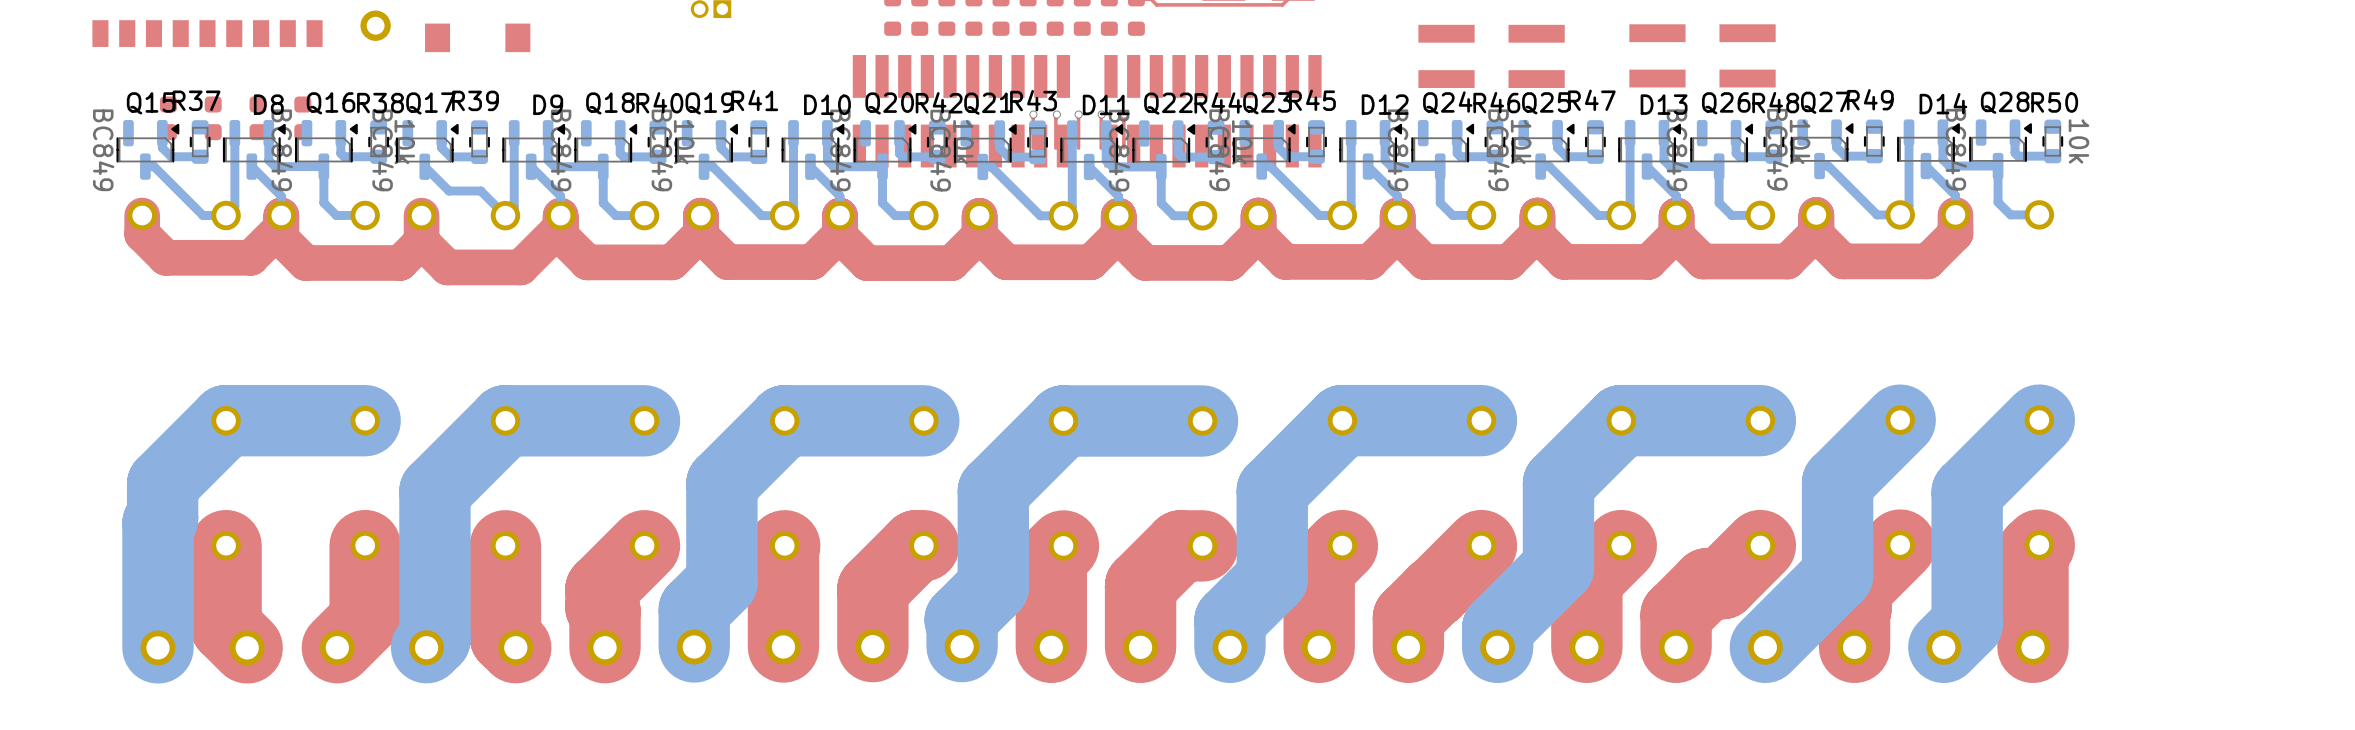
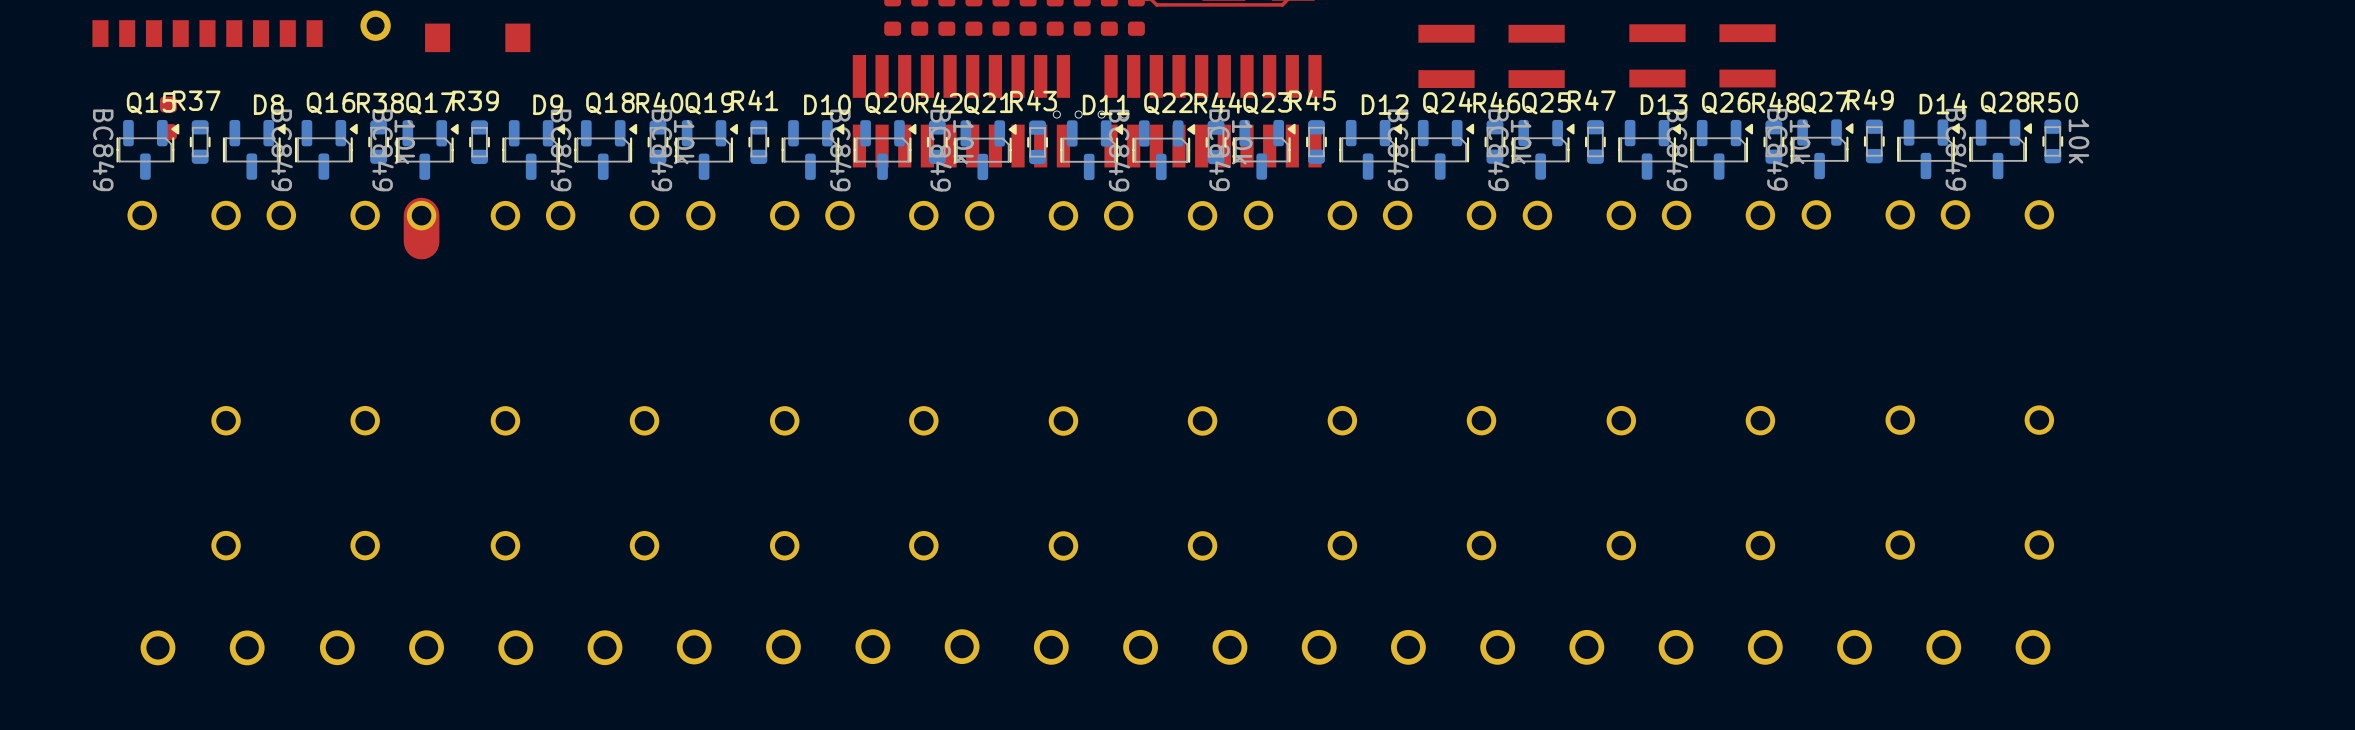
part: (711, 9) -> none
via: (1033, 114) -> none
top track: (1033, 116) (1033, 148) -> none
top track: (1101, 116) (1101, 148) -> none
top track: (1124, 116) (1123, 148) -> none
top track: (1056, 117) (1055, 148) -> none
top track: (1078, 117) (1078, 148) -> none
part: (213, 118) -> none
part: (258, 118) -> none
part: (302, 118) -> none
bottom track: (1836, 132) (1836, 147) (1845, 156) (1874, 156) -> none
bottom track: (1909, 132) (1909, 206) (1900, 214) (1877, 214) (1828, 166) (1819, 166) -> none
bottom track: (1942, 132) (1942, 159) (1949, 166) (1998, 166) (1998, 202) (2010, 214) (2039, 214) -> none
bottom track: (2015, 132) (2015, 152) (2018, 156) (2052, 156) -> none
bottom track: (162, 133) (162, 147) (171, 156) (200, 156) -> none
bottom track: (234, 133) (234, 206) (226, 215) (203, 215) (154, 166) (145, 166) -> none
bottom track: (268, 133) (268, 160) (275, 166) (323, 166) (323, 202) (336, 215) (365, 215) -> none
bottom track: (340, 133) (340, 153) (344, 156) (378, 156) -> none
bottom track: (441, 133) (441, 148) (450, 156) (479, 156) -> none
bottom track: (514, 133) (514, 206) (505, 215) (480, 191) (449, 191) (424, 166) -> none
bottom track: (548, 133) (548, 160) (554, 166) (603, 166) (603, 203) (615, 215) (644, 215) -> none
bottom track: (620, 133) (620, 153) (623, 156) (658, 156) -> none
bottom track: (721, 133) (721, 148) (729, 156) (758, 156) -> none
bottom track: (793, 133) (793, 206) (784, 215) (761, 215) (712, 166) (704, 166) -> none
bottom track: (827, 133) (827, 160) (833, 166) (882, 166) (882, 203) (895, 215) (923, 215) -> none
bottom track: (899, 133) (899, 153) (902, 156) (937, 156) -> none
bottom track: (999, 133) (999, 148) (1008, 157) (1037, 157) -> none
bottom track: (1072, 133) (1072, 207) (1063, 215) (1040, 215) (991, 166) (982, 166) -> none
bottom track: (1106, 133) (1106, 160) (1112, 166) (1161, 166) (1161, 203) (1173, 215) (1202, 215) -> none
bottom track: (1178, 133) (1178, 153) (1181, 157) (1216, 157) -> none
bottom track: (1278, 133) (1278, 147) (1287, 156) (1316, 156) -> none
bottom track: (1351, 133) (1351, 206) (1342, 215) (1319, 215) (1270, 166) (1261, 166) -> none
bottom track: (1385, 133) (1385, 160) (1391, 166) (1440, 166) (1440, 202) (1452, 215) (1481, 215) -> none
bottom track: (1457, 133) (1457, 153) (1460, 156) (1494, 156) -> none
bottom track: (1557, 133) (1557, 147) (1566, 156) (1595, 156) -> none
bottom track: (1630, 133) (1630, 206) (1621, 215) (1598, 215) (1549, 166) (1540, 166) -> none
bottom track: (1664, 133) (1664, 160) (1670, 166) (1719, 166) (1719, 202) (1731, 215) (1760, 215) -> none
bottom track: (1736, 133) (1736, 153) (1739, 156) (1773, 156) -> none
bottom track: (251, 166) (281, 196) (281, 215) -> none
bottom track: (531, 166) (560, 196) (560, 215) -> none
bottom track: (810, 166) (839, 196) (839, 215) -> none
bottom track: (1089, 166) (1118, 196) (1118, 215) -> none
bottom track: (1368, 166) (1397, 196) (1397, 215) -> none
bottom track: (1647, 166) (1676, 196) (1676, 215) -> none
bottom track: (1925, 166) (1955, 195) (1955, 214) -> none
top track: (1955, 214) (1955, 233) (1927, 261) (1843, 261) (1816, 234) (1816, 214) -> none
top track: (142, 215) (142, 234) (165, 257) (250, 257) (281, 227) -> none
top track: (281, 215) (281, 238) (305, 262) (400, 262) (421, 241) (447, 267) (520, 267) (560, 227) -> none
top track: (560, 215) (560, 235) (587, 262) (671, 262) (700, 233) -> none
top track: (700, 215) (700, 235) (727, 262) (812, 262) (839, 234) -> none
top track: (839, 215) (839, 236) (867, 263) (951, 263) (979, 235) -> none
top track: (979, 215) (979, 235) (1006, 262) (1090, 262) (1118, 234) -> none
top track: (1118, 215) (1118, 236) (1145, 262) (1229, 262) (1258, 234) -> none
top track: (1258, 215) (1258, 235) (1285, 261) (1369, 261) (1397, 234) -> none
top track: (1397, 215) (1397, 235) (1424, 262) (1509, 262) (1537, 233) -> none
top track: (1537, 215) (1537, 235) (1564, 261) (1648, 261) (1676, 234) -> none
top track: (1676, 215) (1676, 235) (1702, 261) (1787, 261) (1816, 232) -> none
bottom track: (365, 420) (226, 420) (162, 484) (162, 518) (157, 523) (157, 647) -> none
bottom track: (644, 420) (505, 420) (434, 491) (434, 639) (426, 647) -> none
bottom track: (923, 420) (784, 420) (721, 483) (721, 582) (694, 609) (694, 647) -> none
bottom track: (1202, 420) (1063, 420) (993, 491) (993, 586) (960, 619) (962, 621) (962, 646) -> none
bottom track: (1481, 420) (1342, 420) (1272, 490) (1272, 578) (1229, 620) (1229, 647) -> none
bottom track: (1760, 420) (1621, 420) (1558, 483) (1558, 567) (1497, 628) (1497, 647) -> none
bottom track: (1900, 420) (1837, 482) (1837, 575) (1765, 647) -> none
bottom track: (2039, 420) (1967, 492) (1967, 623) (1943, 647) -> none
top track: (226, 545) (226, 626) (247, 647) -> none
top track: (365, 545) (365, 619) (337, 647) -> none
top track: (505, 545) (505, 637) (515, 647) -> none
top track: (644, 545) (600, 589) (600, 607) (605, 611) (605, 647) -> none
top track: (784, 545) (783, 647) -> none
top track: (923, 545) (916, 545) (872, 589) (872, 646) -> none
top track: (1063, 545) (1051, 558) (1051, 647) -> none
top track: (1202, 545) (1180, 545) (1140, 585) (1140, 647) -> none
top track: (1342, 545) (1319, 568) (1319, 647) -> none
top track: (1481, 545) (1408, 617) (1408, 647) -> none
top track: (1621, 545) (1586, 580) (1586, 647) -> none
top track: (1760, 545) (1722, 583) (1707, 583) (1676, 615) (1676, 647) -> none
top track: (1900, 545) (1855, 589) (1854, 647) -> none
top track: (2039, 545) (2033, 551) (2033, 647) -> none

